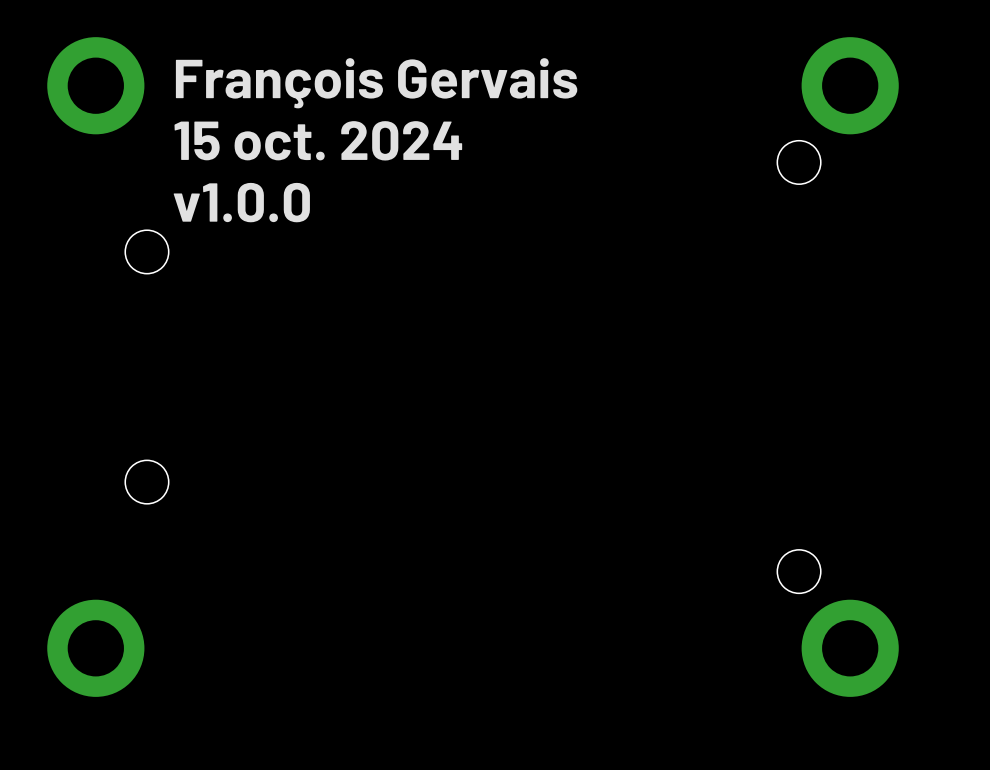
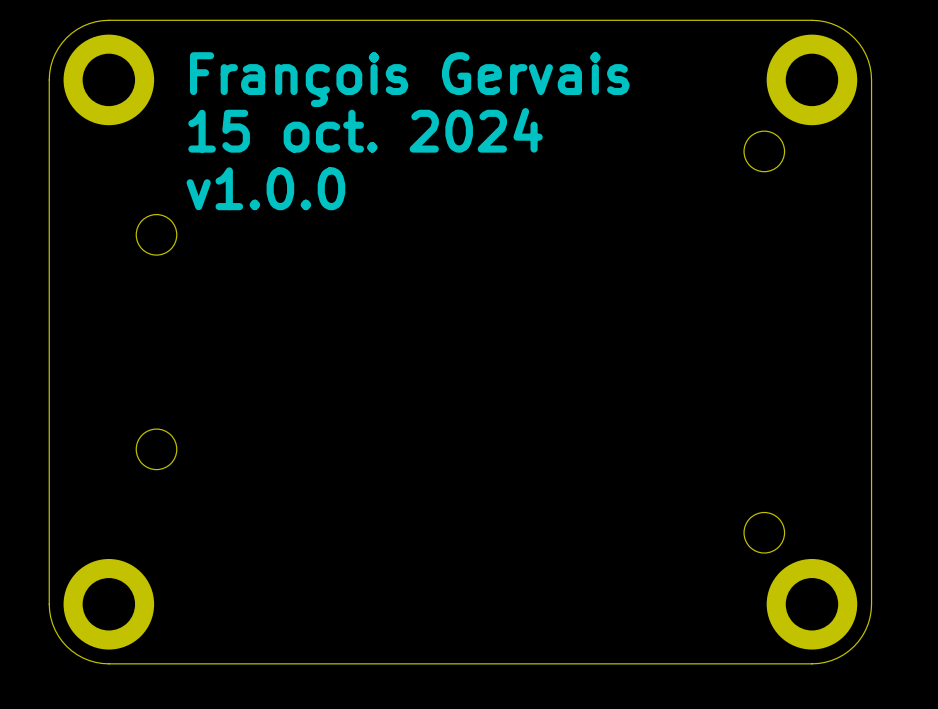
board edge: none -> (811, 20) (108, 20) (89, 23) (71, 33) (55, 54) (49, 79) (49, 604) (52, 623) (62, 641) (82, 657) (108, 663) (811, 663) (831, 660) (849, 650) (865, 630) (871, 604) (871, 73) (862, 48) (849, 33) (831, 23) (811, 20)

